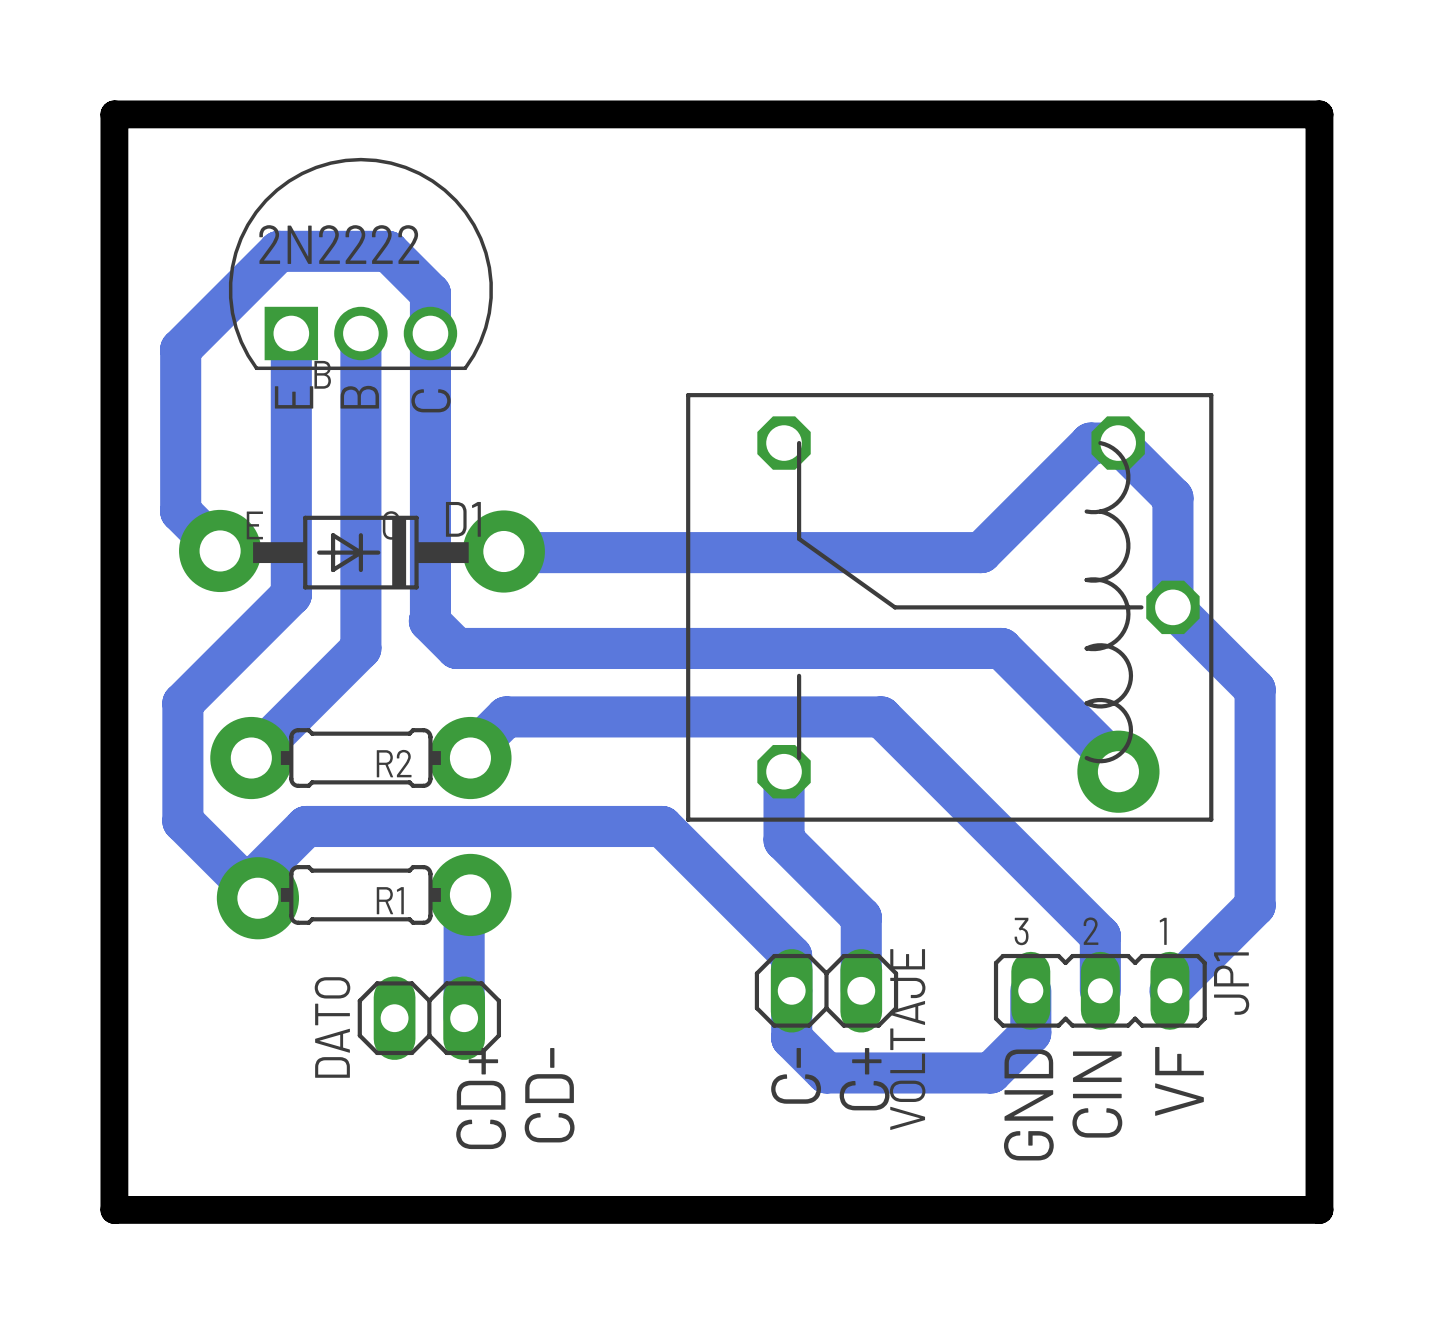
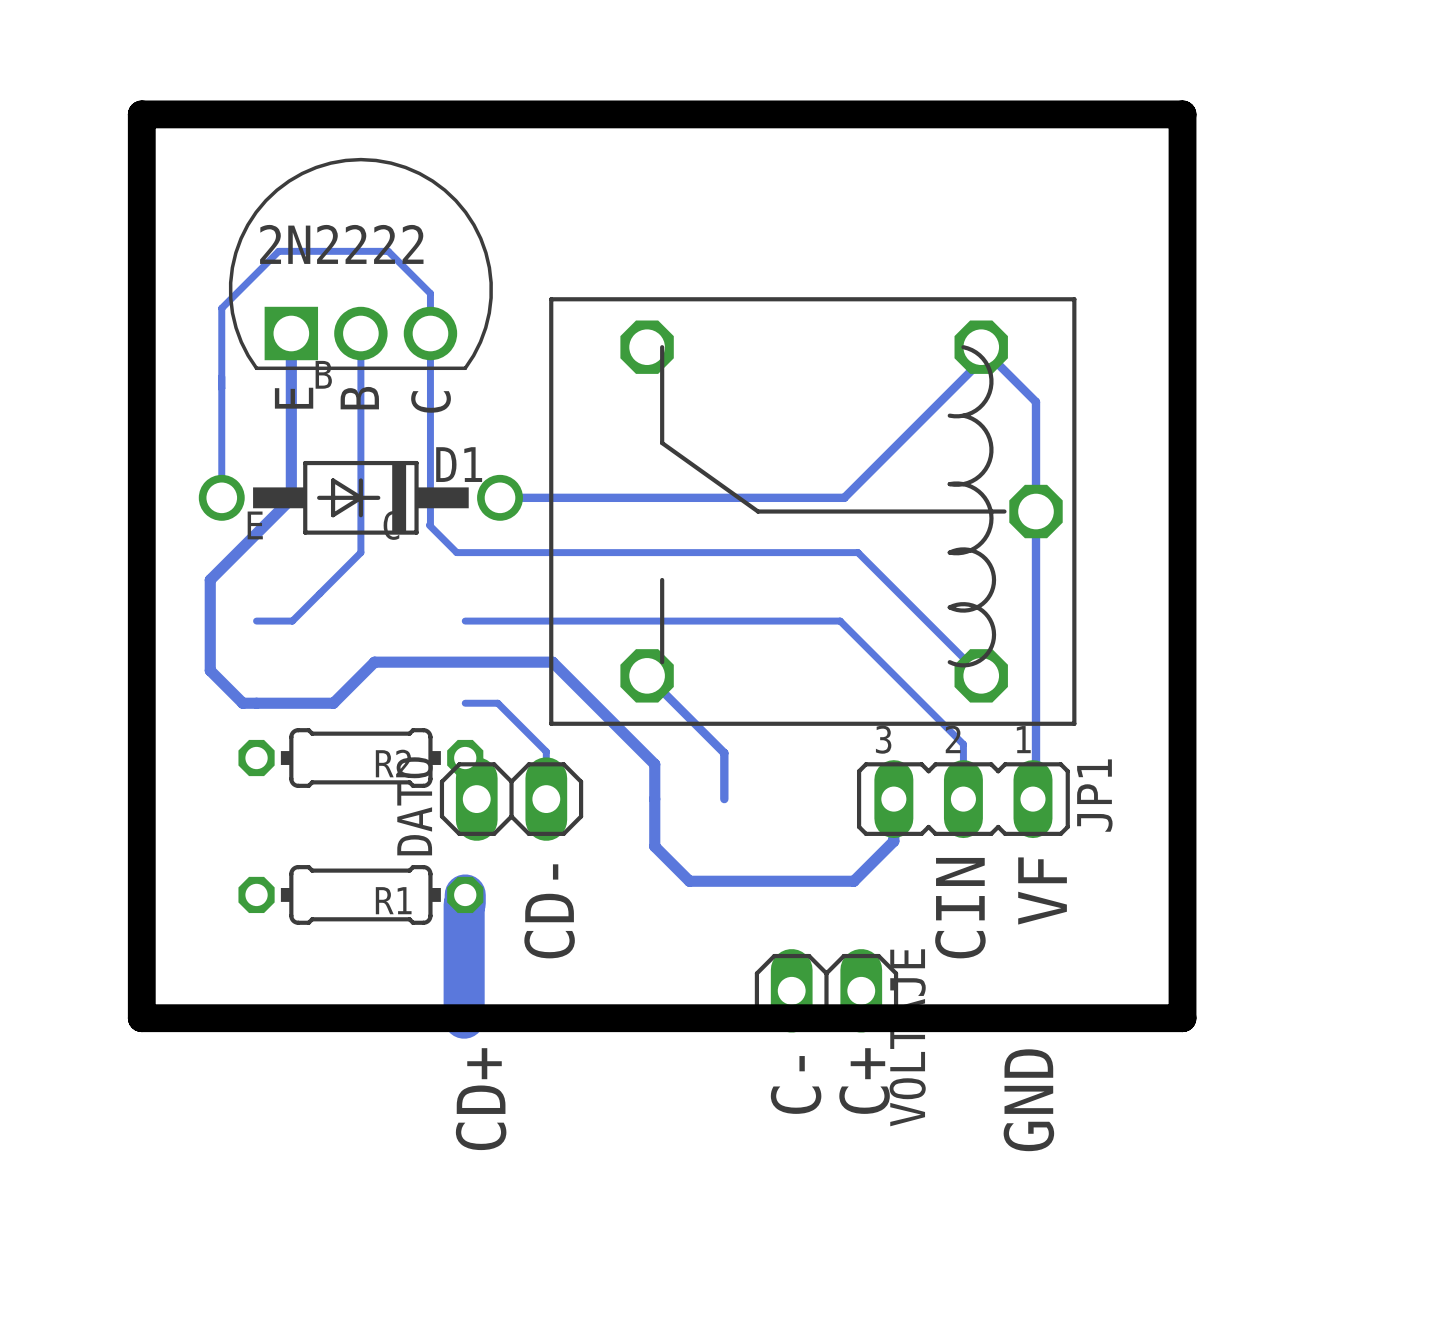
board edge: (141, 114) (114, 114) (114, 1209) (1319, 1209) (1319, 114) (1182, 114) -> (141, 114) (141, 1018) (1182, 1018) (1182, 114)
bottom track: (221, 308) (180, 349) (180, 511) (221, 552) -> (221, 308) (221, 497)
bottom track width: thick (221, 308) (278, 251) (388, 251) (430, 293) (430, 524) -> thin (221, 308) (278, 251) (388, 251) (430, 293) (430, 524)
bottom track width: thick (291, 333) (291, 498) -> thin (291, 333) (291, 498)
bottom track width: thick (360, 333) (360, 552) -> thin (360, 333) (360, 552)
bottom track: none -> (500, 497) (844, 497) (981, 360) (981, 347) (1036, 401) (1036, 796) (1032, 799)
bottom track: (291, 498) (291, 594) (182, 703) (182, 821) (256, 894) (256, 876) (306, 826) (662, 826) (791, 956) (791, 1038) (826, 1072) (990, 1072) (1030, 1032) (1030, 990) -> (291, 498) (210, 579) (210, 670) (242, 703) (333, 703) (374, 662) (552, 662) (654, 764) (654, 846) (689, 881) (853, 881) (893, 841) (893, 799)
bottom track: (430, 524) (429, 621) (456, 648) (1001, 648) (1118, 765) (1118, 771) -> (430, 524) (429, 525) (456, 552) (500, 552)
via: (220, 550) -> none
via: (503, 551) -> none
bottom track: (360, 552) (360, 648) (256, 752) (256, 758) -> (360, 552) (292, 621) (256, 621)
D1 position: (360, 552) -> (360, 497)
bottom track width: thick (500, 552) (857, 552) -> thin (500, 552) (857, 552)
bottom track: (857, 552) (981, 552) (1090, 443) (1118, 443) (1172, 497) (1172, 607) (1255, 689) (1255, 905) (1169, 990) -> (857, 552) (981, 675)
part position: (949, 607) -> (812, 511)
bottom track: none -> (465, 621) (840, 621) (963, 744) (963, 799)
bottom track: none -> (647, 675) (724, 753) (724, 799)
bottom track: none -> (465, 703) (497, 703) (546, 751) (546, 799)
via: (251, 758) -> none
bottom track: (465, 758) (506, 716) (881, 716) (1100, 936) (1100, 990) -> none
via: (470, 758) -> none
bottom track: (784, 771) (784, 840) (861, 917) (861, 990) -> none
via: (1118, 771) -> none
via: (470, 894) -> none
via: (257, 898) -> none
JP1 position: (1100, 990) -> (963, 799)
DATO position: (429, 1018) -> (511, 799)
text position: VF (1179, 1081) -> VF (1042, 891)
text position: CIN (1097, 1094) -> CIN (960, 908)
text position: CD- (549, 1095) -> CD- (549, 911)

